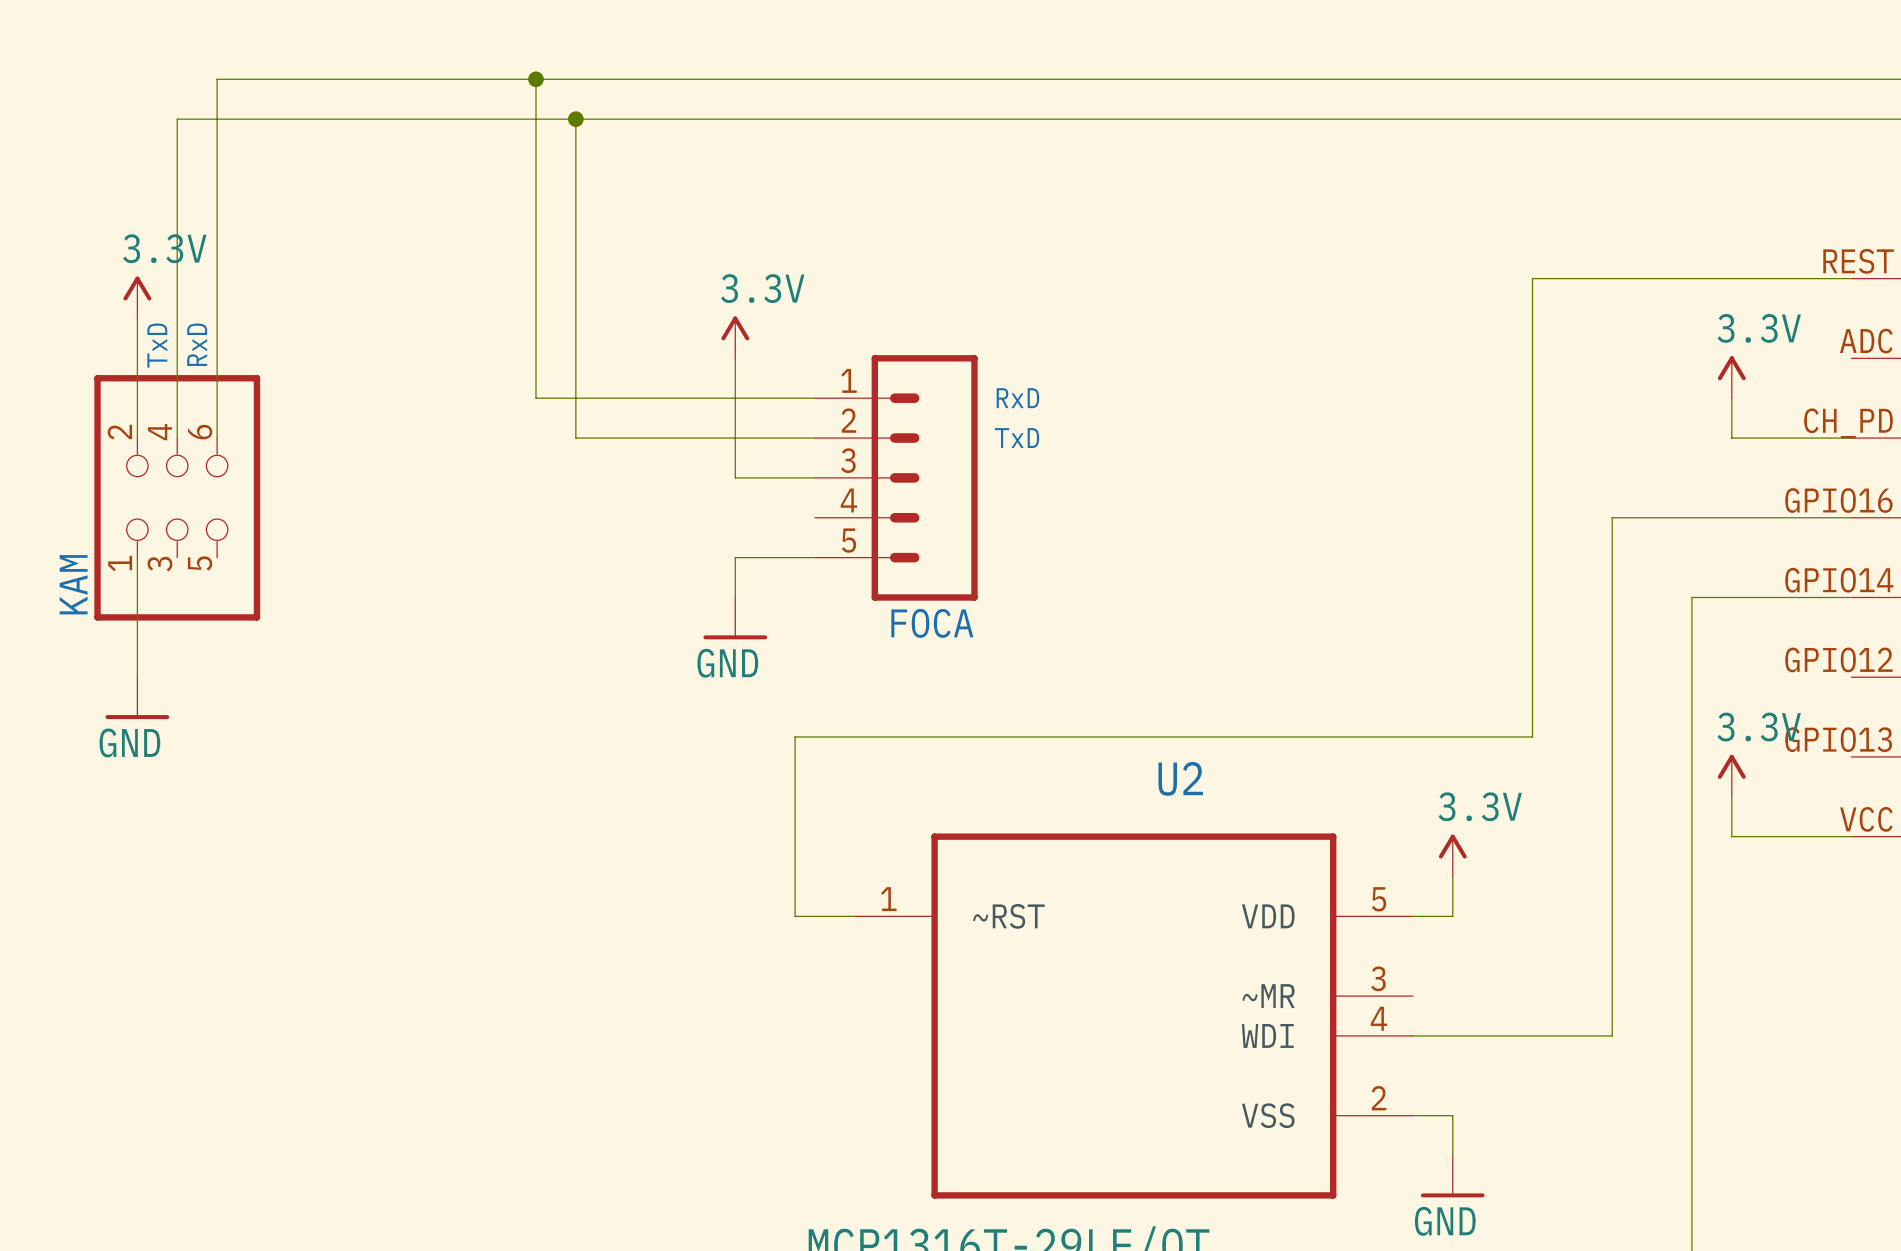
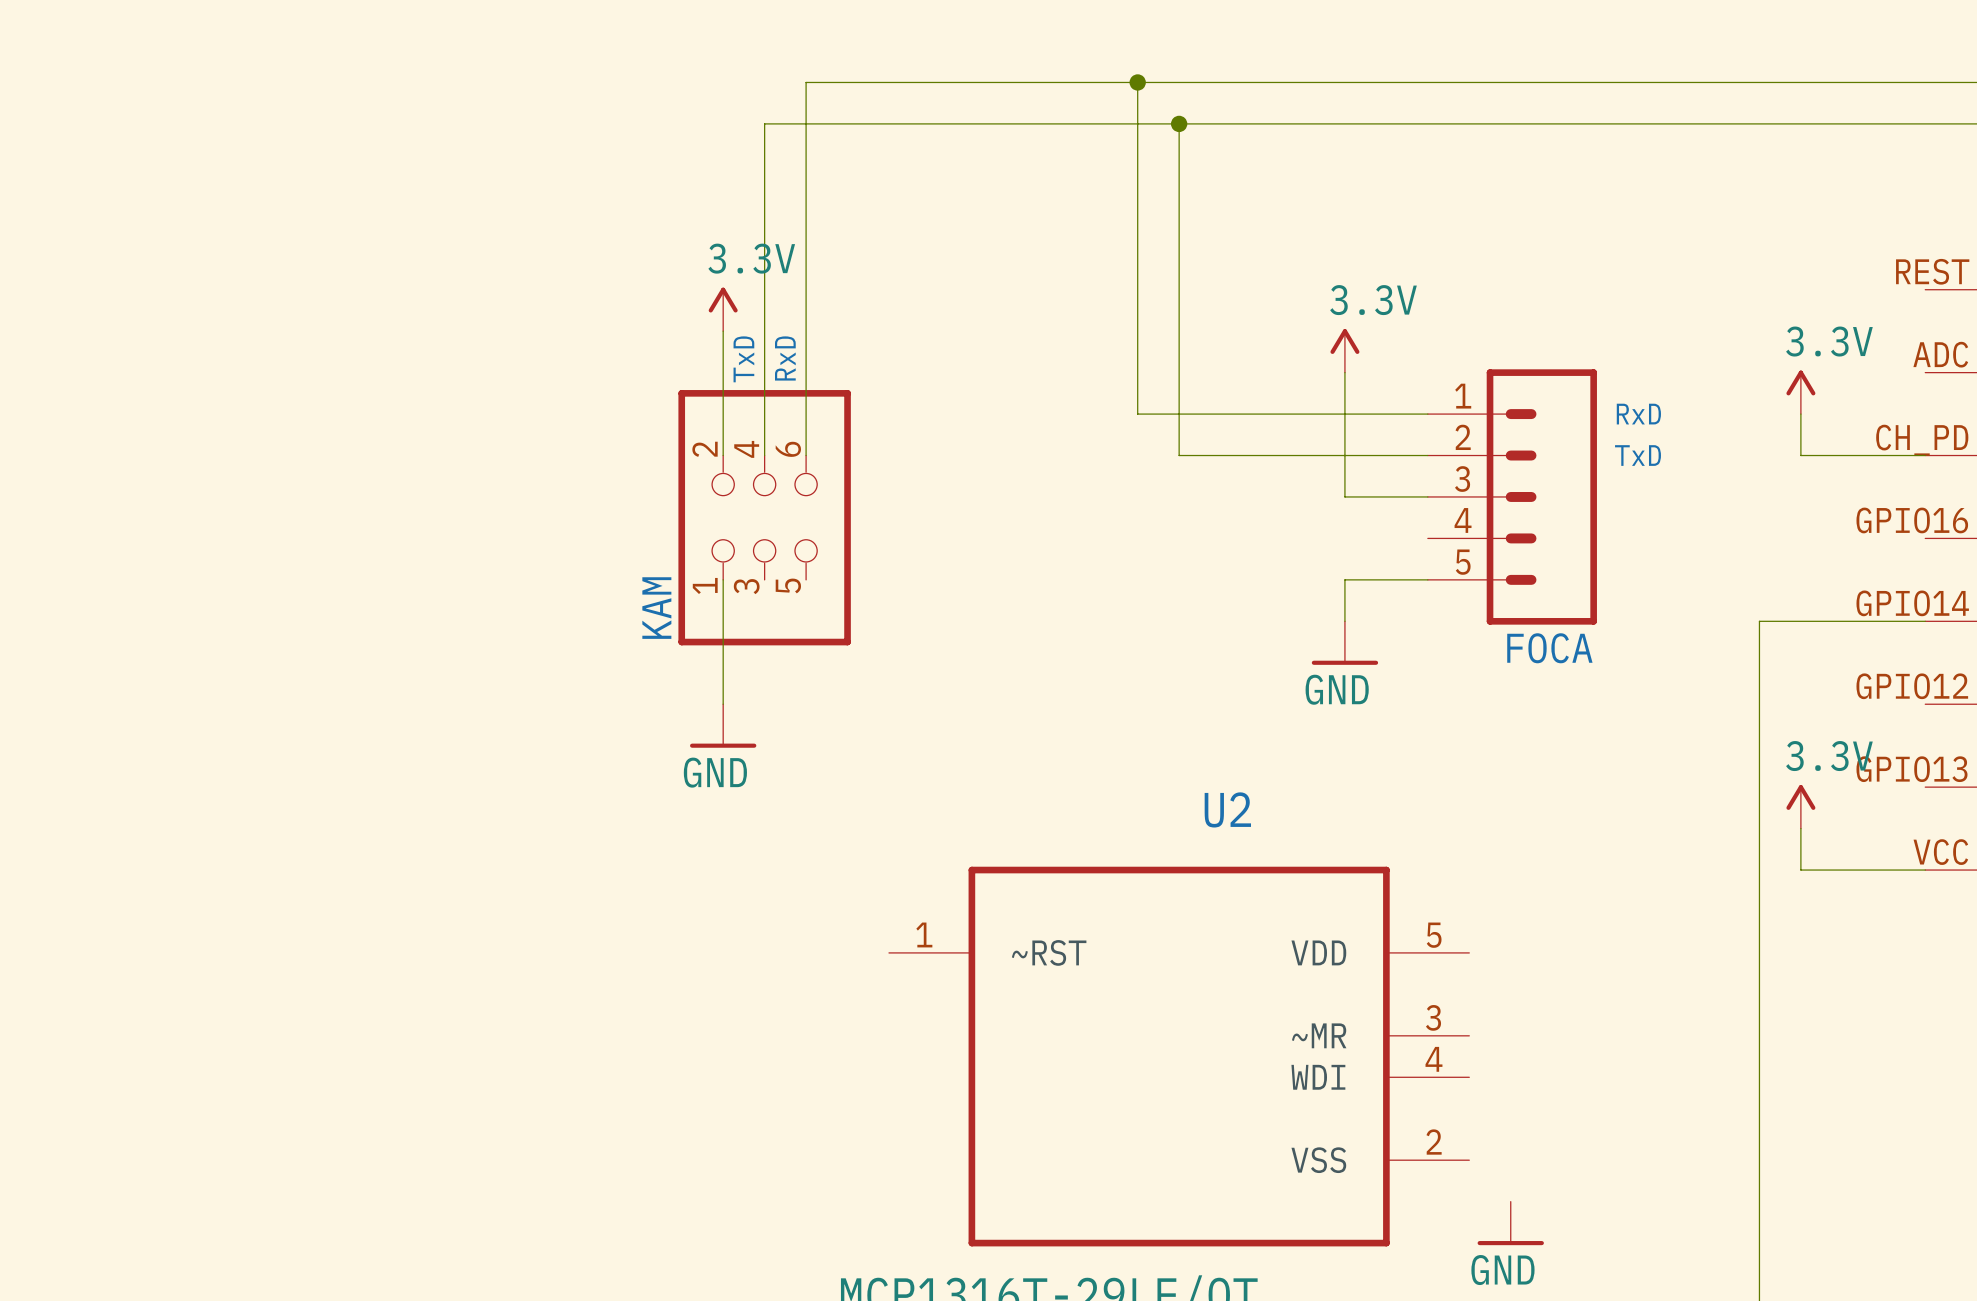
wire: (535, 79) (535, 398) (815, 398) -> none
junction: (535, 79) -> none
wire: (775, 79) (217, 79) (217, 438) -> (806, 82) (806, 455)
wire: none -> (1137, 82) (1137, 414) (1427, 414)
junction: none -> (1137, 82)
wire: (575, 119) (575, 438) (815, 438) -> none
junction: (575, 119) -> none
wire: (735, 119) (177, 119) (177, 438) -> (764, 123) (764, 372)
wire: none -> (1179, 123) (1179, 455) (1427, 455)
junction: none -> (1179, 123)
wire: (1851, 278) (1532, 278) (1532, 736) (795, 736) (795, 916) (854, 916) -> none
power symbol: 3.3V (137, 297) -> none
wire: (137, 318) (137, 438) -> none
wire: none -> (723, 331) (723, 455)
power symbol position: 3.3V (735, 337) -> 3.3V (723, 309)
power symbol: none -> 3.3V (1344, 350)
text: RxD (197, 344) -> none
text: TxD (157, 345) -> none
text: none -> TxD (743, 359)
wire: none -> (1344, 372) (1344, 496) (1427, 496)
text rotation: 0° (1017, 398) -> 90° counterclockwise (785, 358)
text position: RxD (1017, 398) -> RxD (785, 358)
text: none -> RxD (1638, 414)
wire: (735, 438) (735, 477) (815, 477) -> none
text: TxD (1017, 438) -> none
text: none -> TxD (1638, 455)
FOCA: (896, 477) -> none
FOCA: none -> (1512, 496)
KAM: (177, 497) -> none
KAM: none -> (764, 517)
wire: (1851, 517) (1612, 517) (1612, 1035) (1412, 1035) -> none
wire: (137, 557) (137, 677) -> none
wire: none -> (723, 579) (723, 704)
wire: (815, 557) (735, 557) (735, 597) -> none
wire: none -> (1427, 579) (1344, 579) (1344, 621)
power symbol position: GND (735, 618) -> GND (723, 725)
power symbol: none -> GND (1344, 643)
power symbol: GND (137, 698) -> none
power symbol: 3.3V (1452, 855) -> none
wire: (1452, 876) (1452, 916) (1412, 916) -> none
wire: (1412, 1115) (1452, 1115) (1452, 1155) -> none

